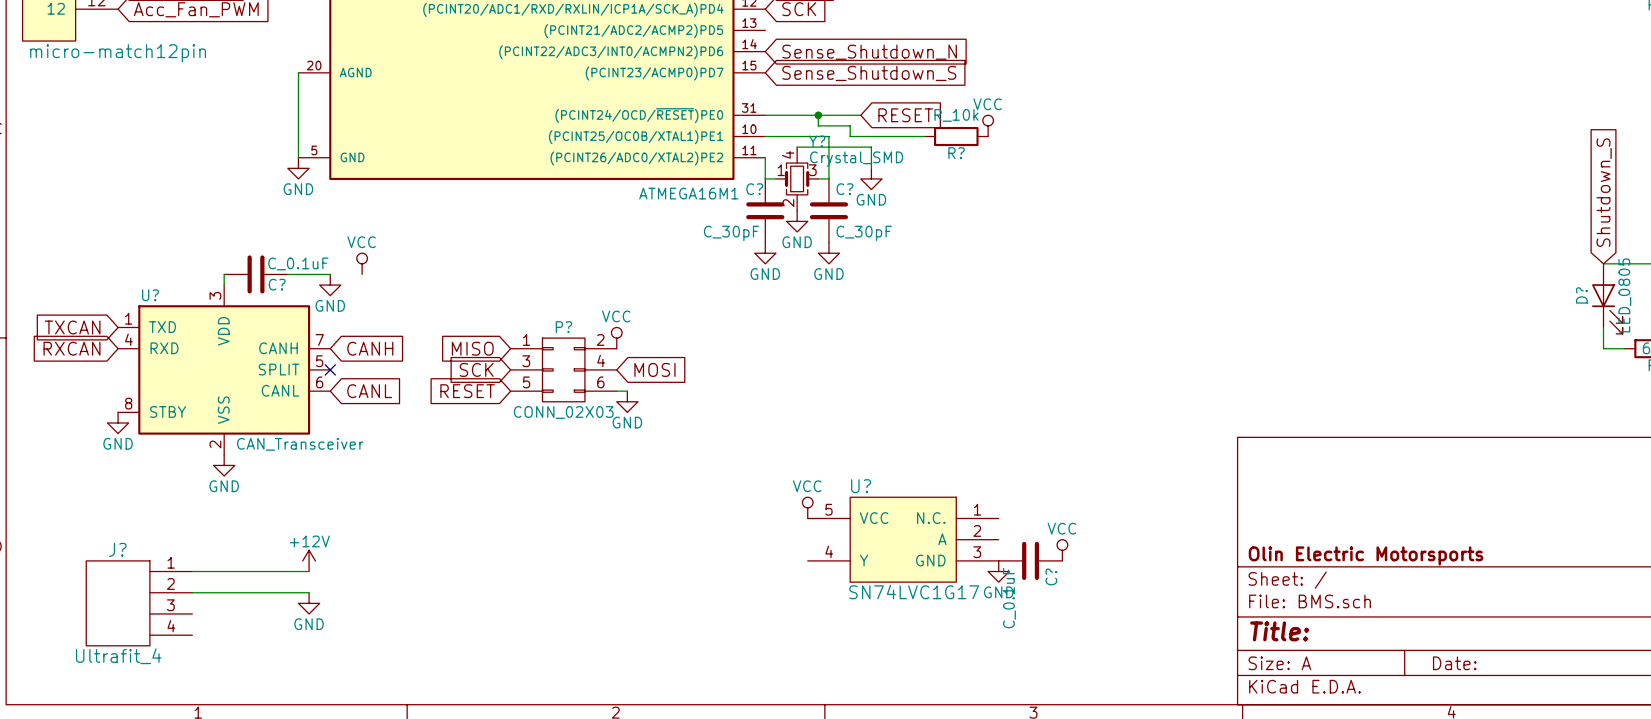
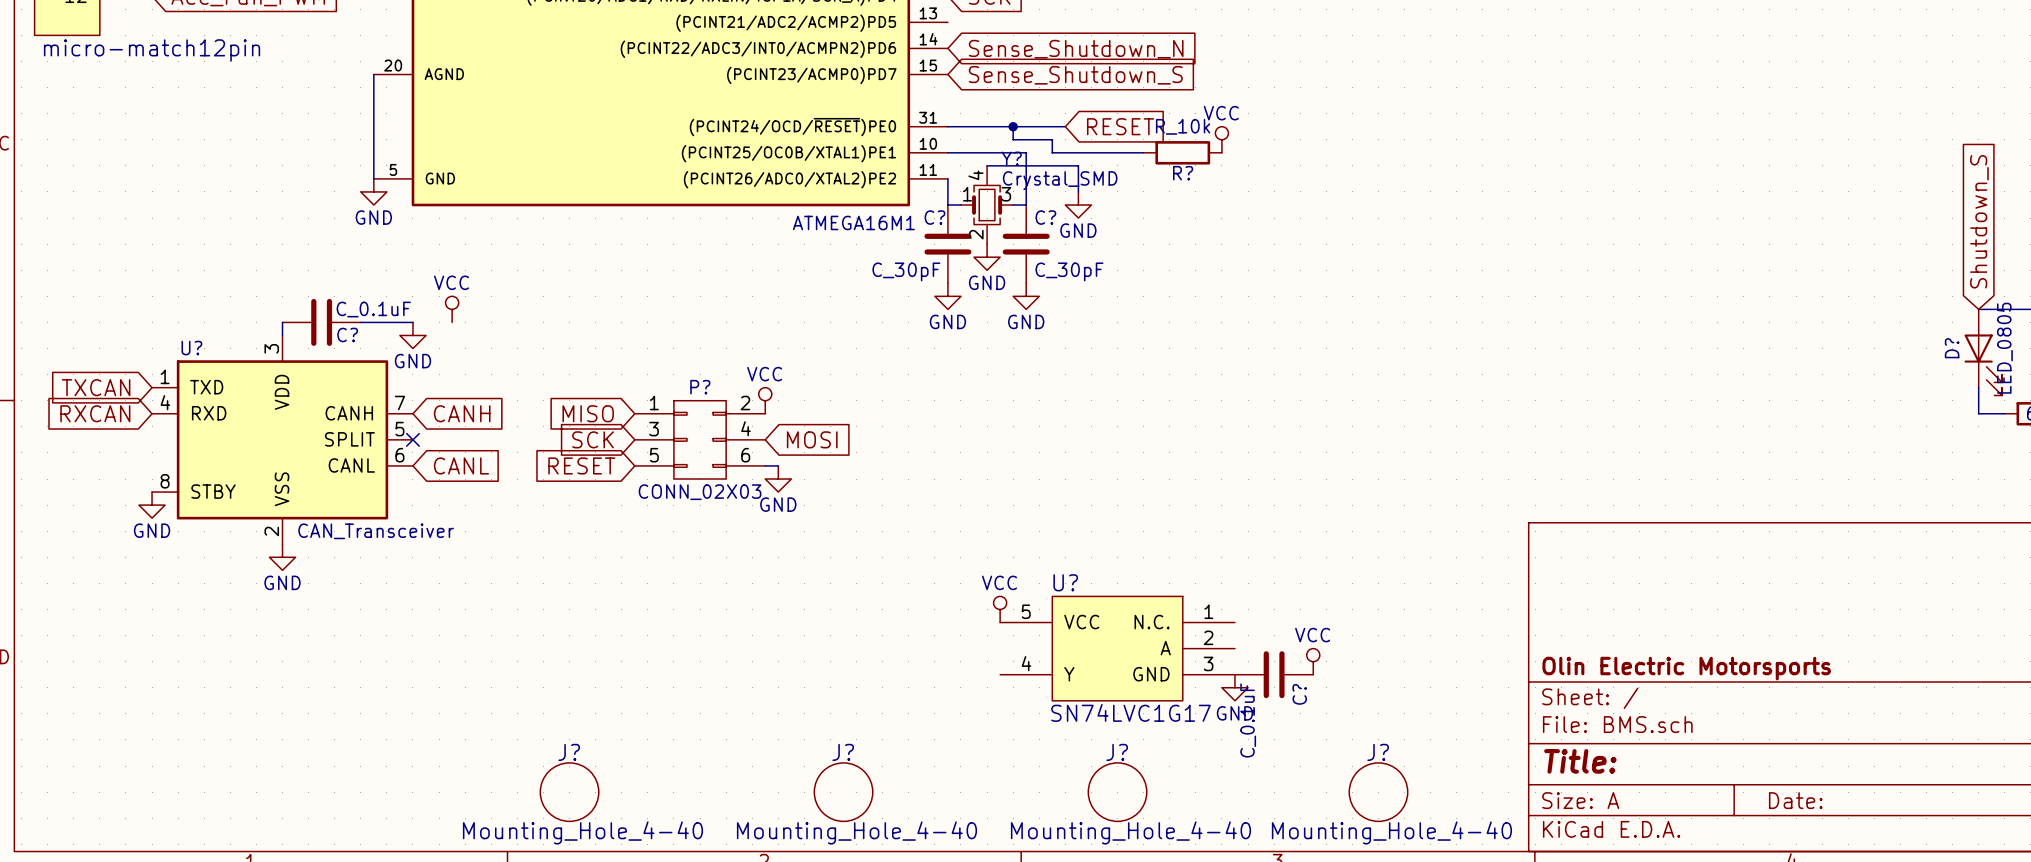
power symbol: +12V (309, 560) -> none
wire: (192, 571) (309, 571) -> none
wire: (192, 592) (309, 592) -> none
J?: Ultrafit_4 (139, 603) -> none
power symbol: GND (309, 603) -> none
J?: none -> Mounting_Hole_4-40 (569, 792)
J?: none -> Mounting_Hole_4-40 (843, 792)
J?: none -> Mounting_Hole_4-40 (1117, 792)
J?: none -> Mounting_Hole_4-40 (1378, 792)

